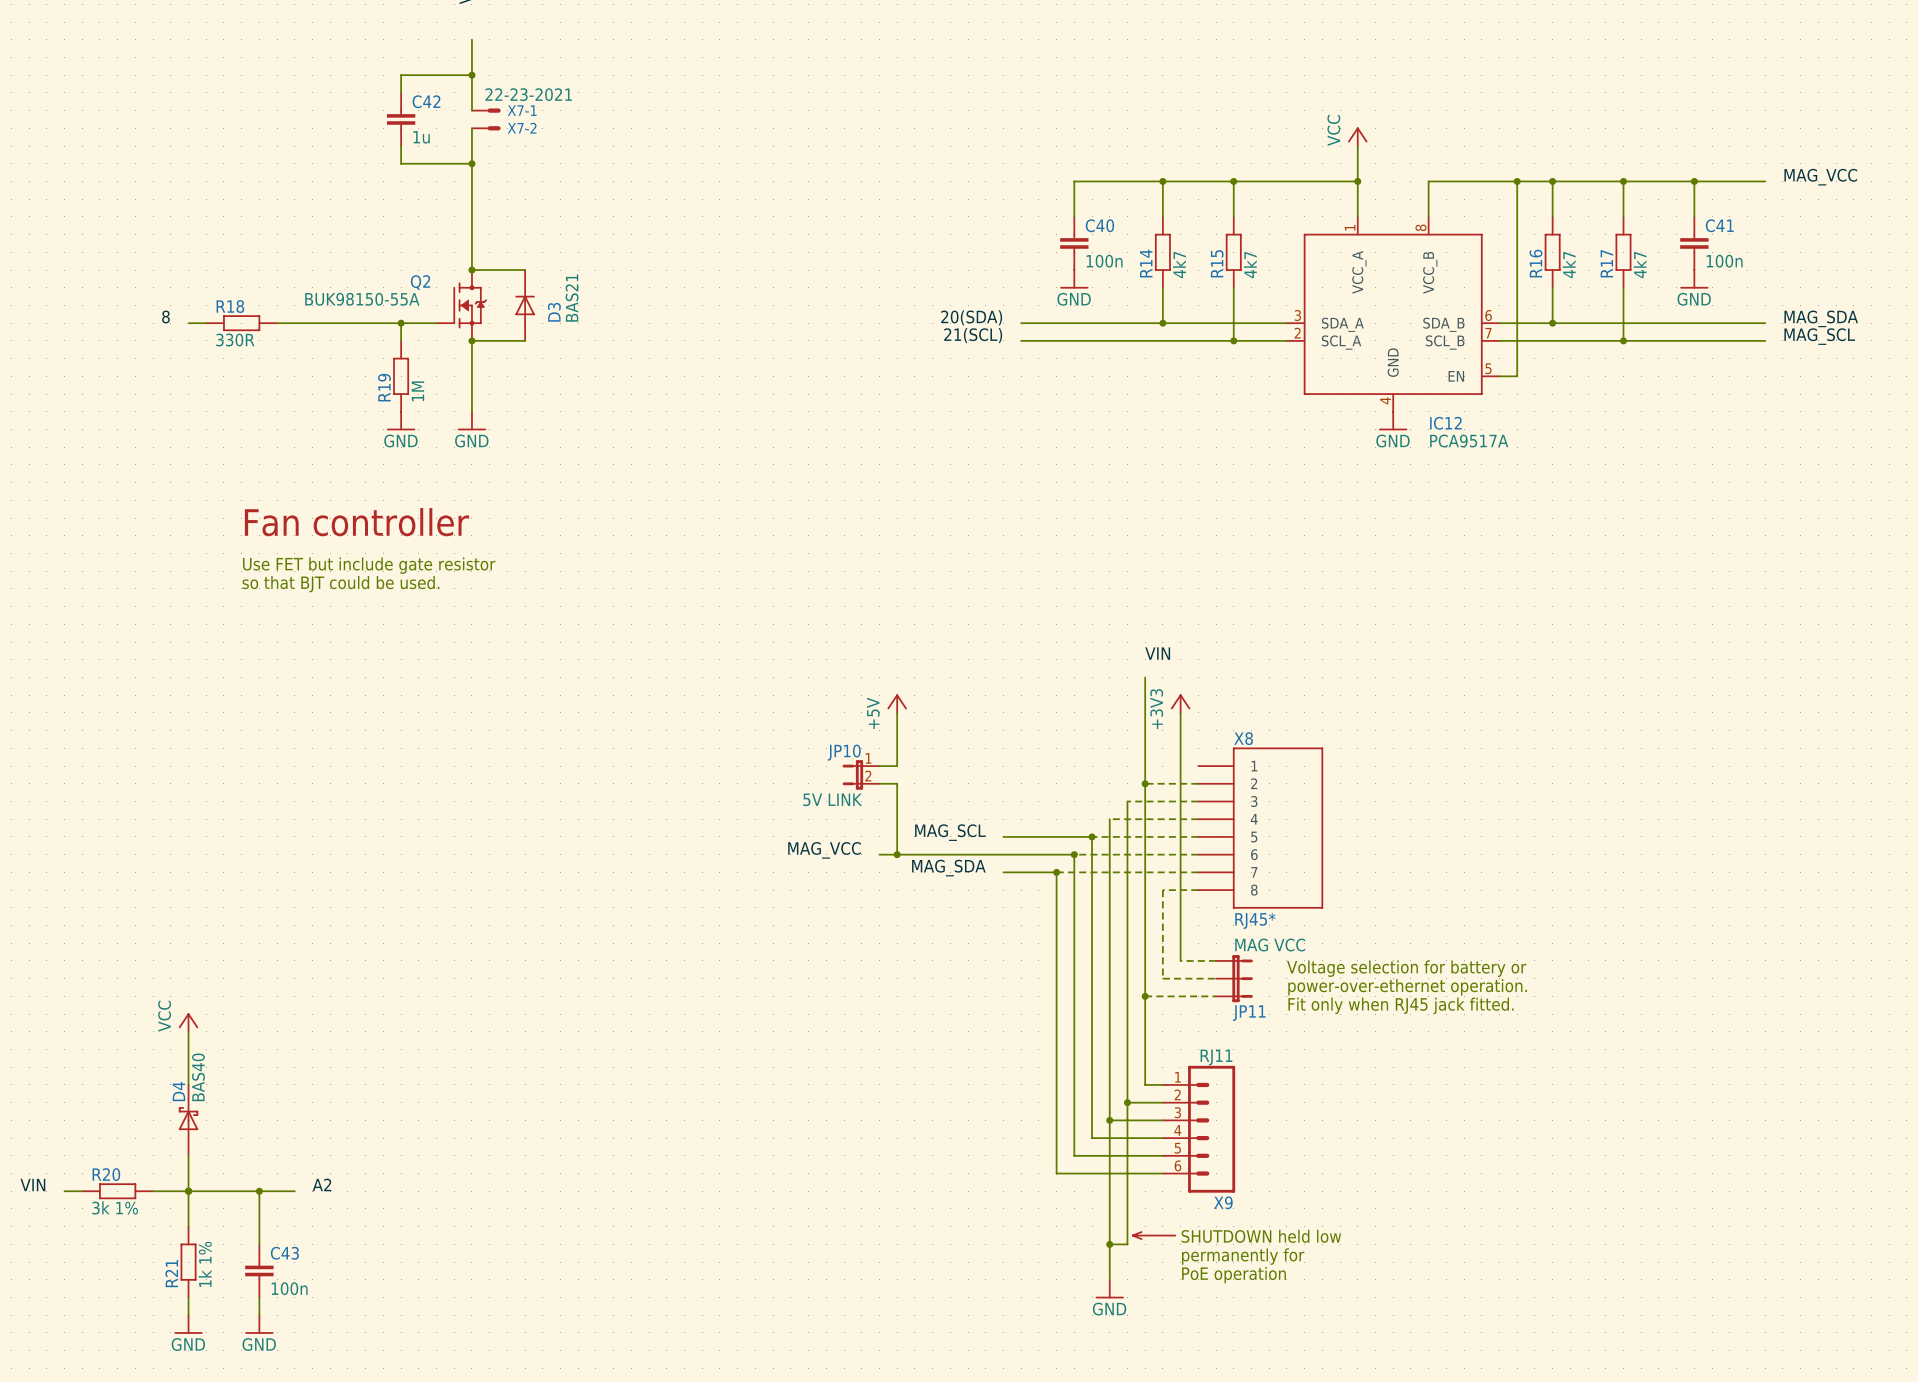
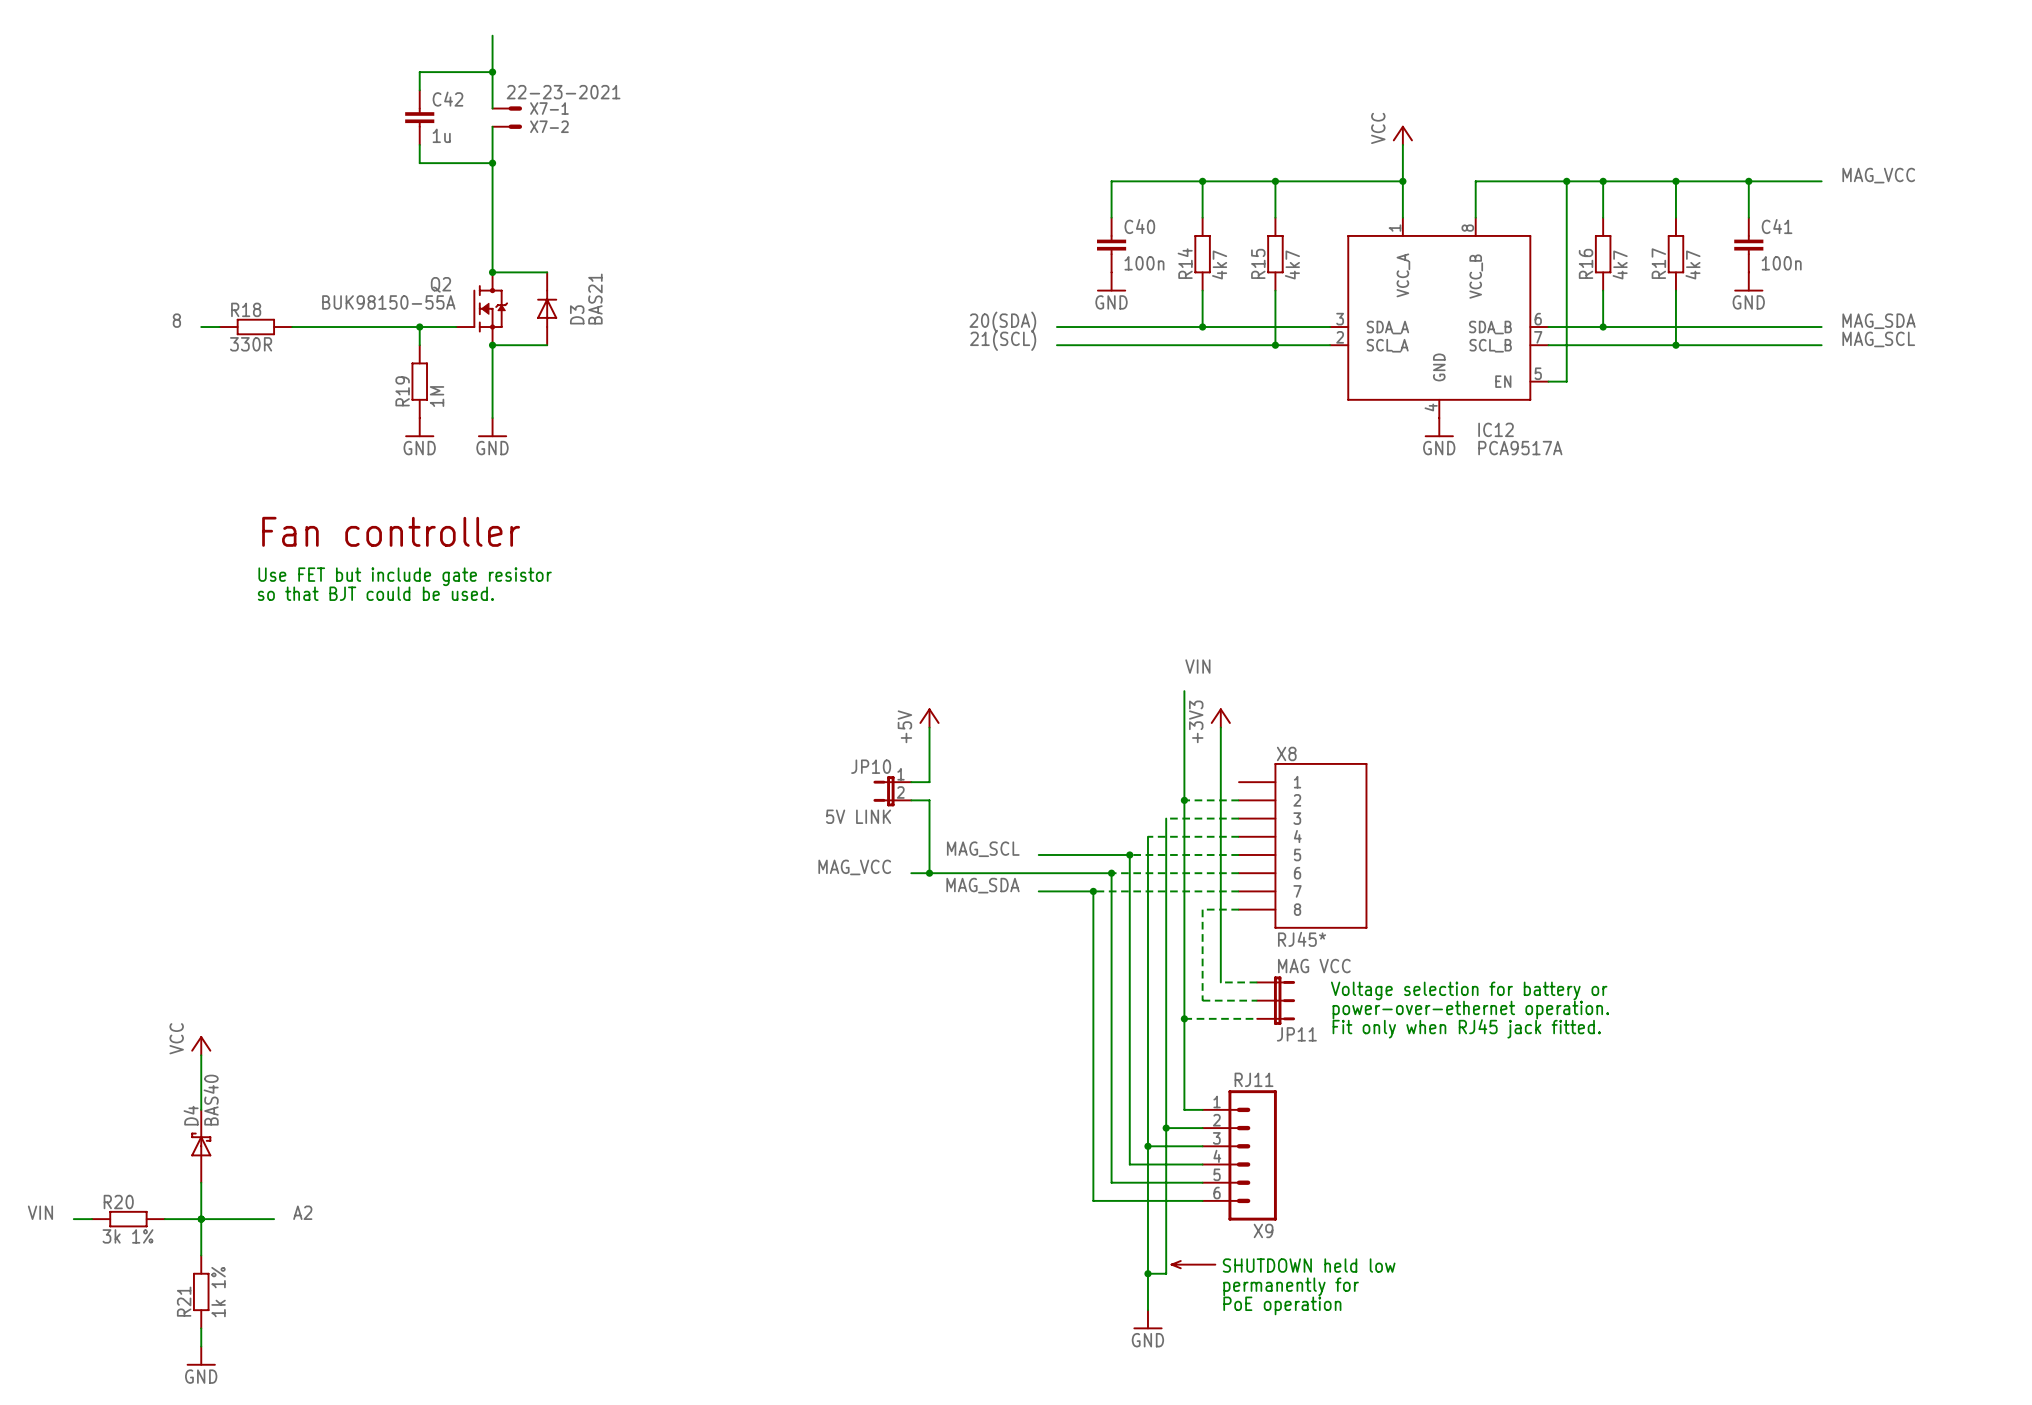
label position: A2 (321, 1184) -> A2 (302, 1212)
junction: (259, 1191) -> none
wire: (294, 1191) (259, 1191) (259, 1244) -> none
C43: 100n (259, 1270) -> none
wire: (259, 1297) (259, 1315) -> none
power symbol: GND (259, 1324) -> none

